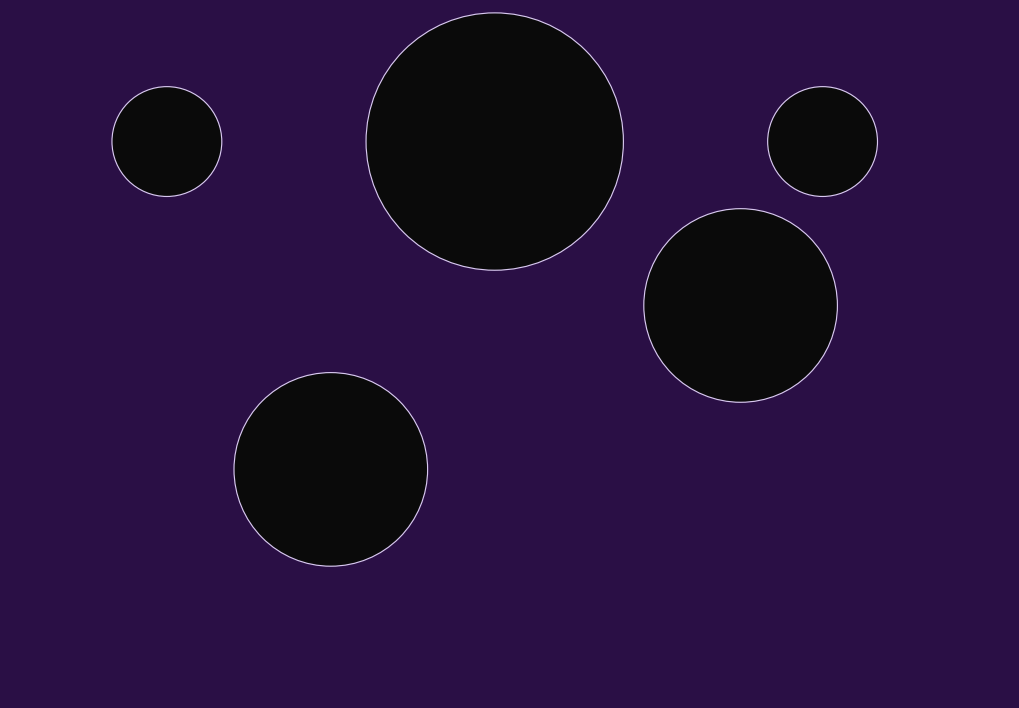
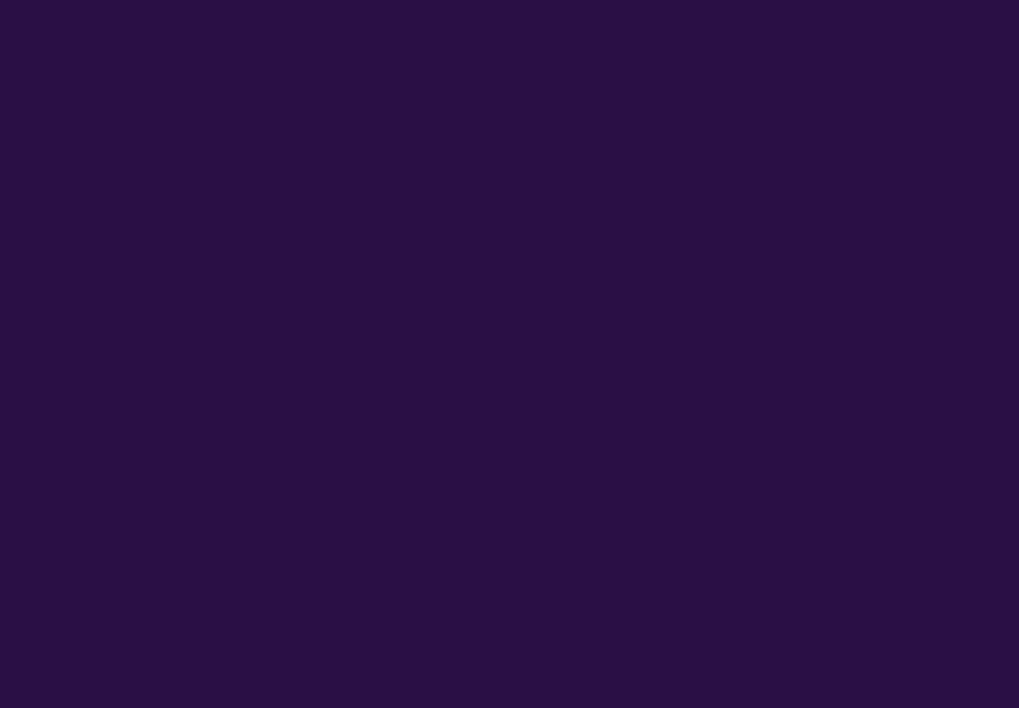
part: (494, 289) -> none

